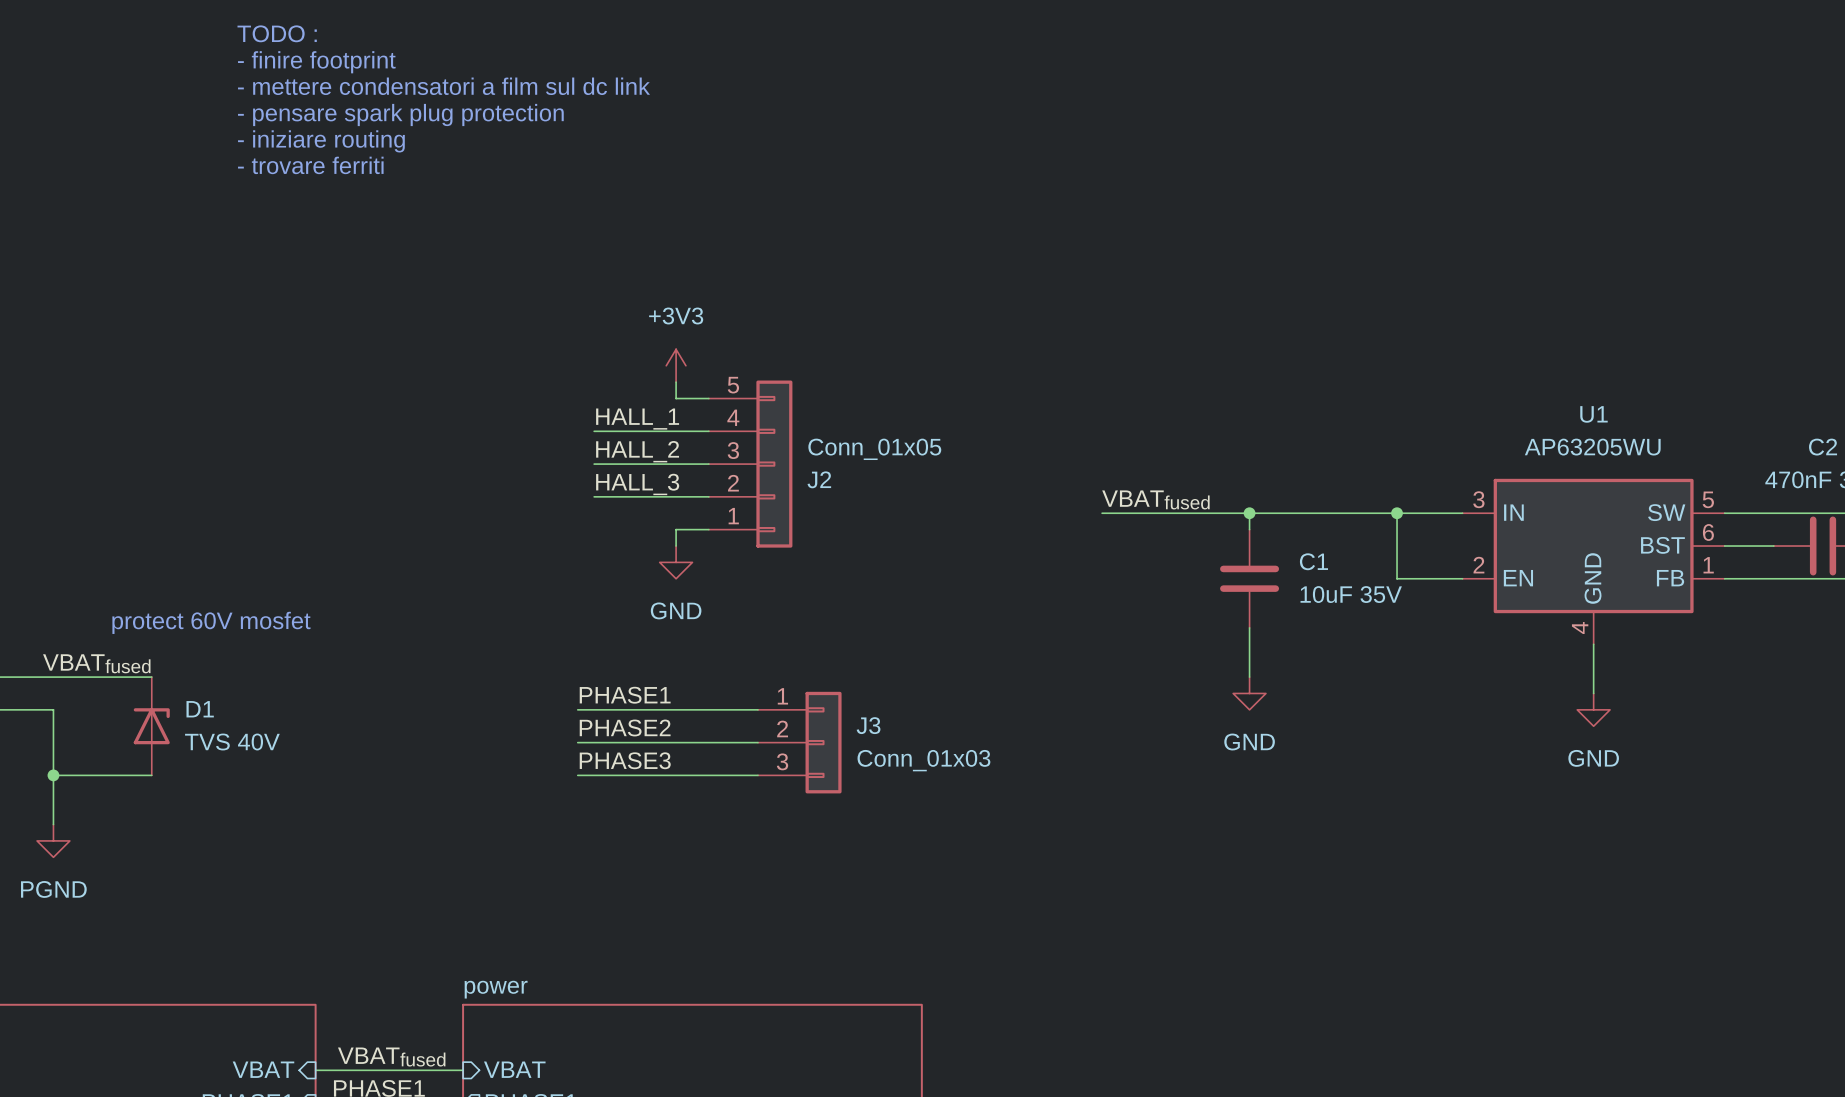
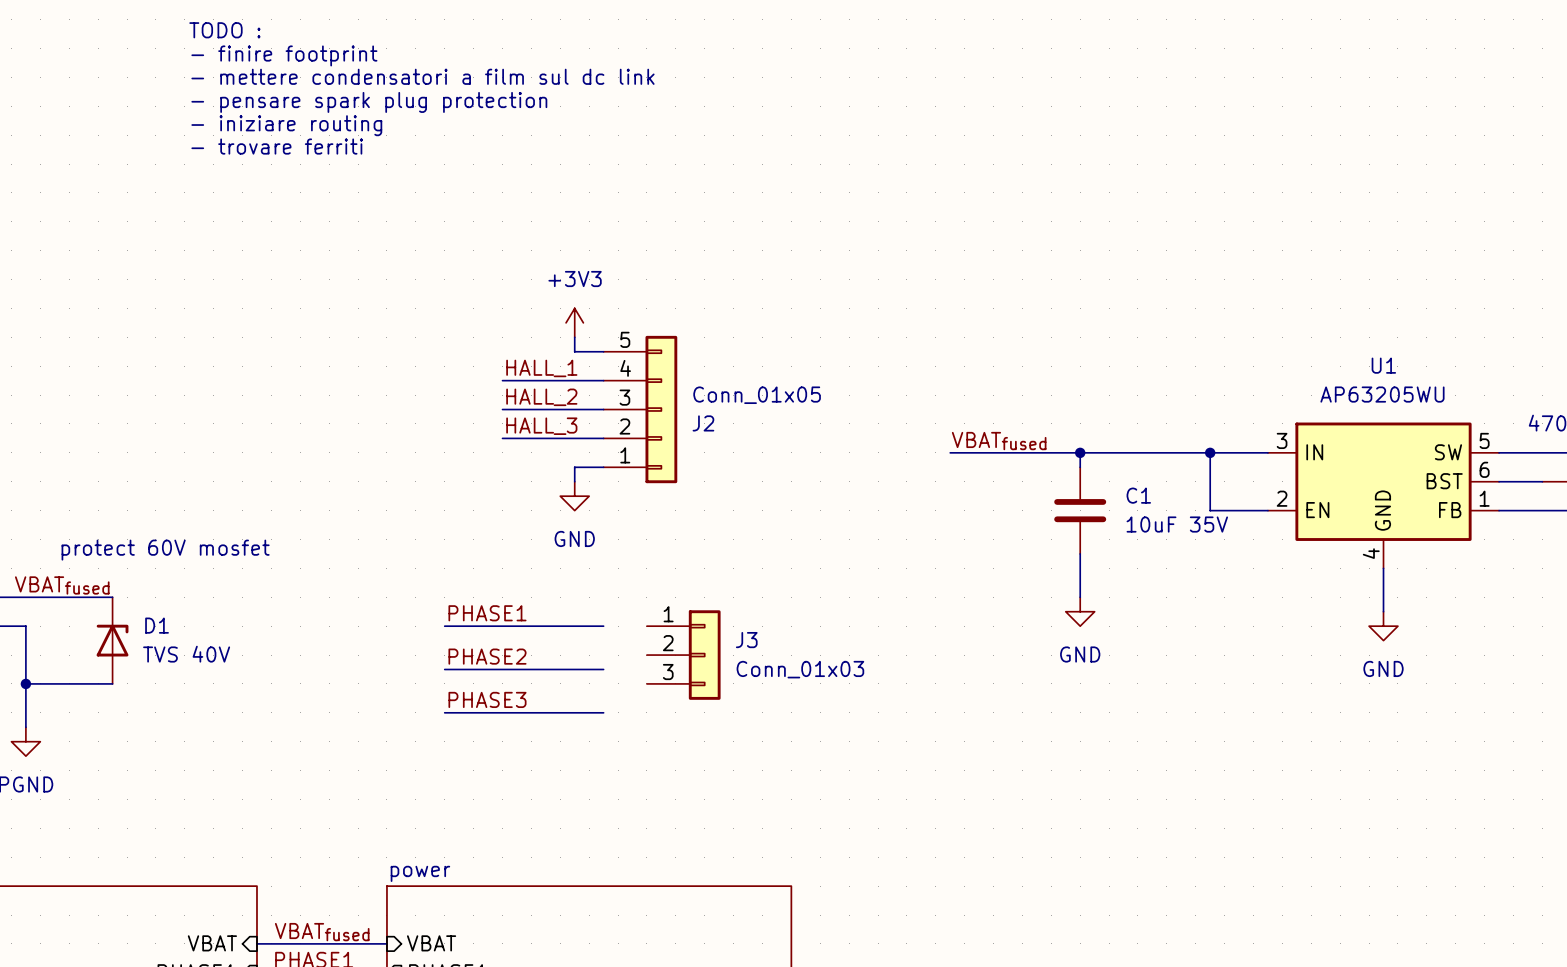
label position: PHASE1 (625, 695) -> PHASE1 (487, 613)
wire: (708, 709) (758, 709) -> (444, 626) (488, 626)
label position: PHASE2 (625, 727) -> PHASE2 (487, 656)
wire: (577, 742) (758, 742) -> (444, 669) (603, 669)
label position: PHASE3 (625, 760) -> PHASE3 (487, 699)
wire: (577, 775) (758, 775) -> (444, 712) (603, 712)

